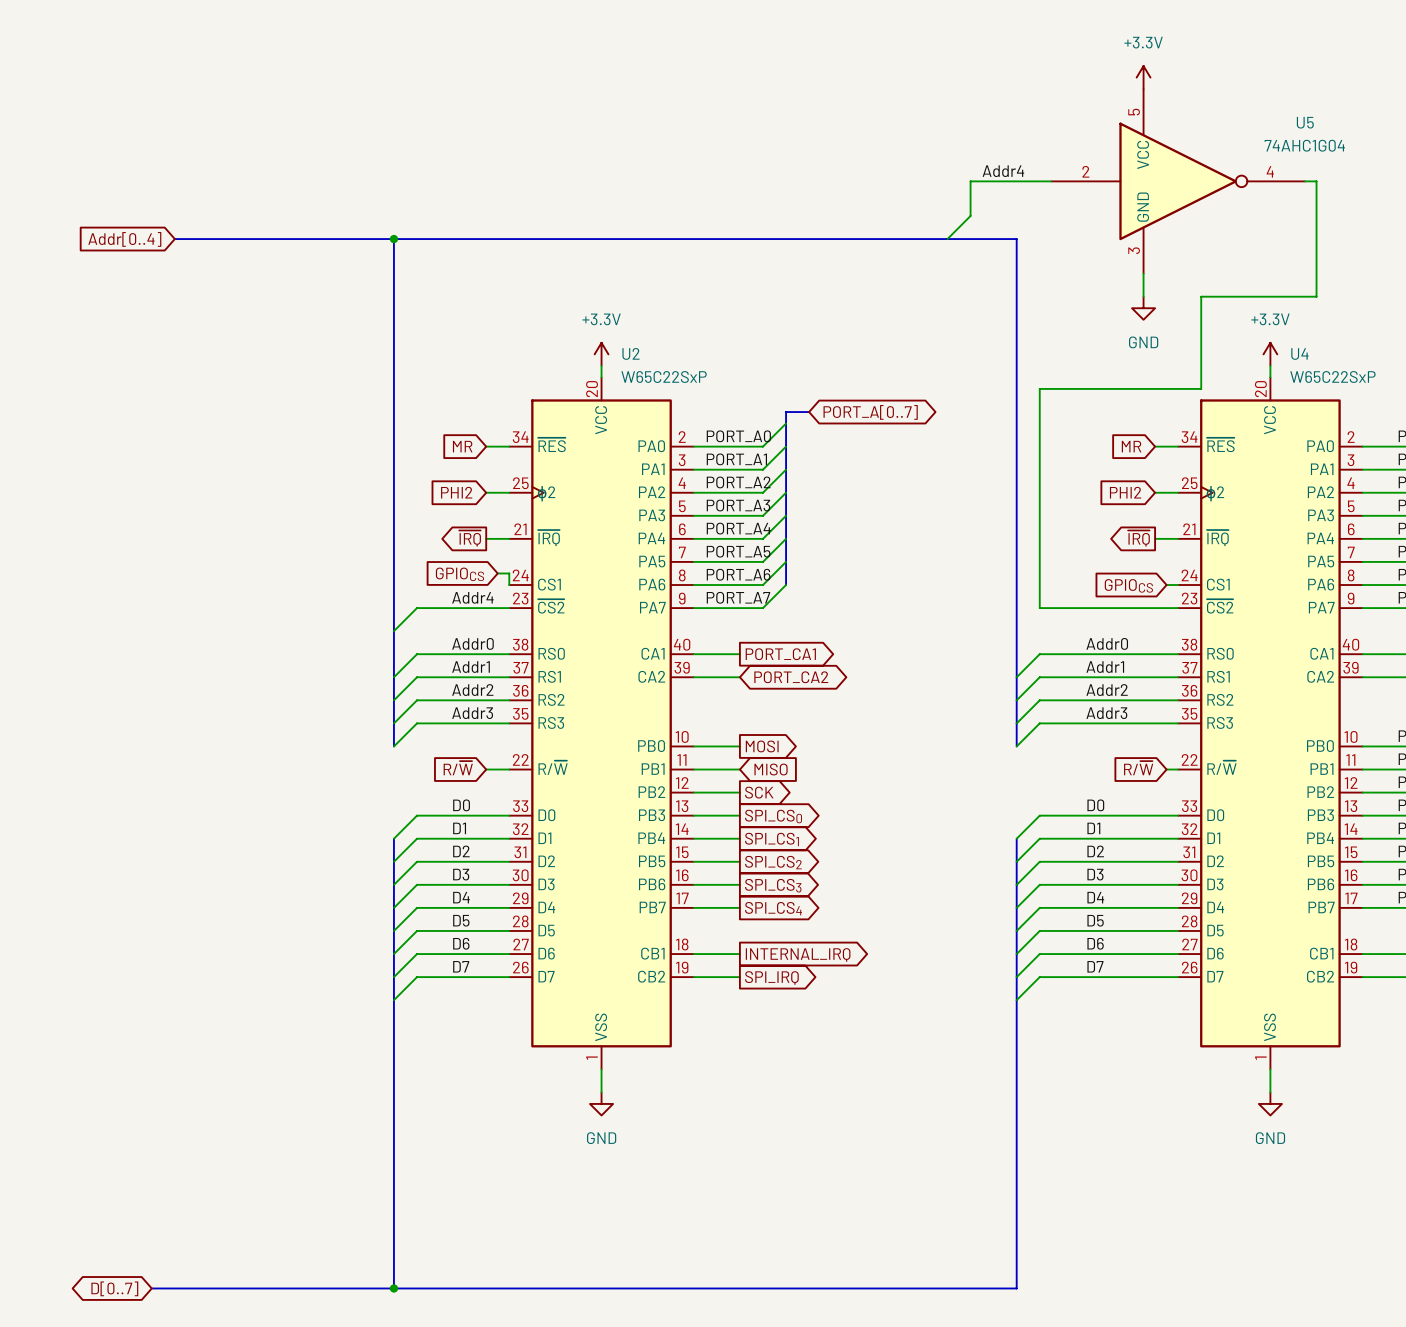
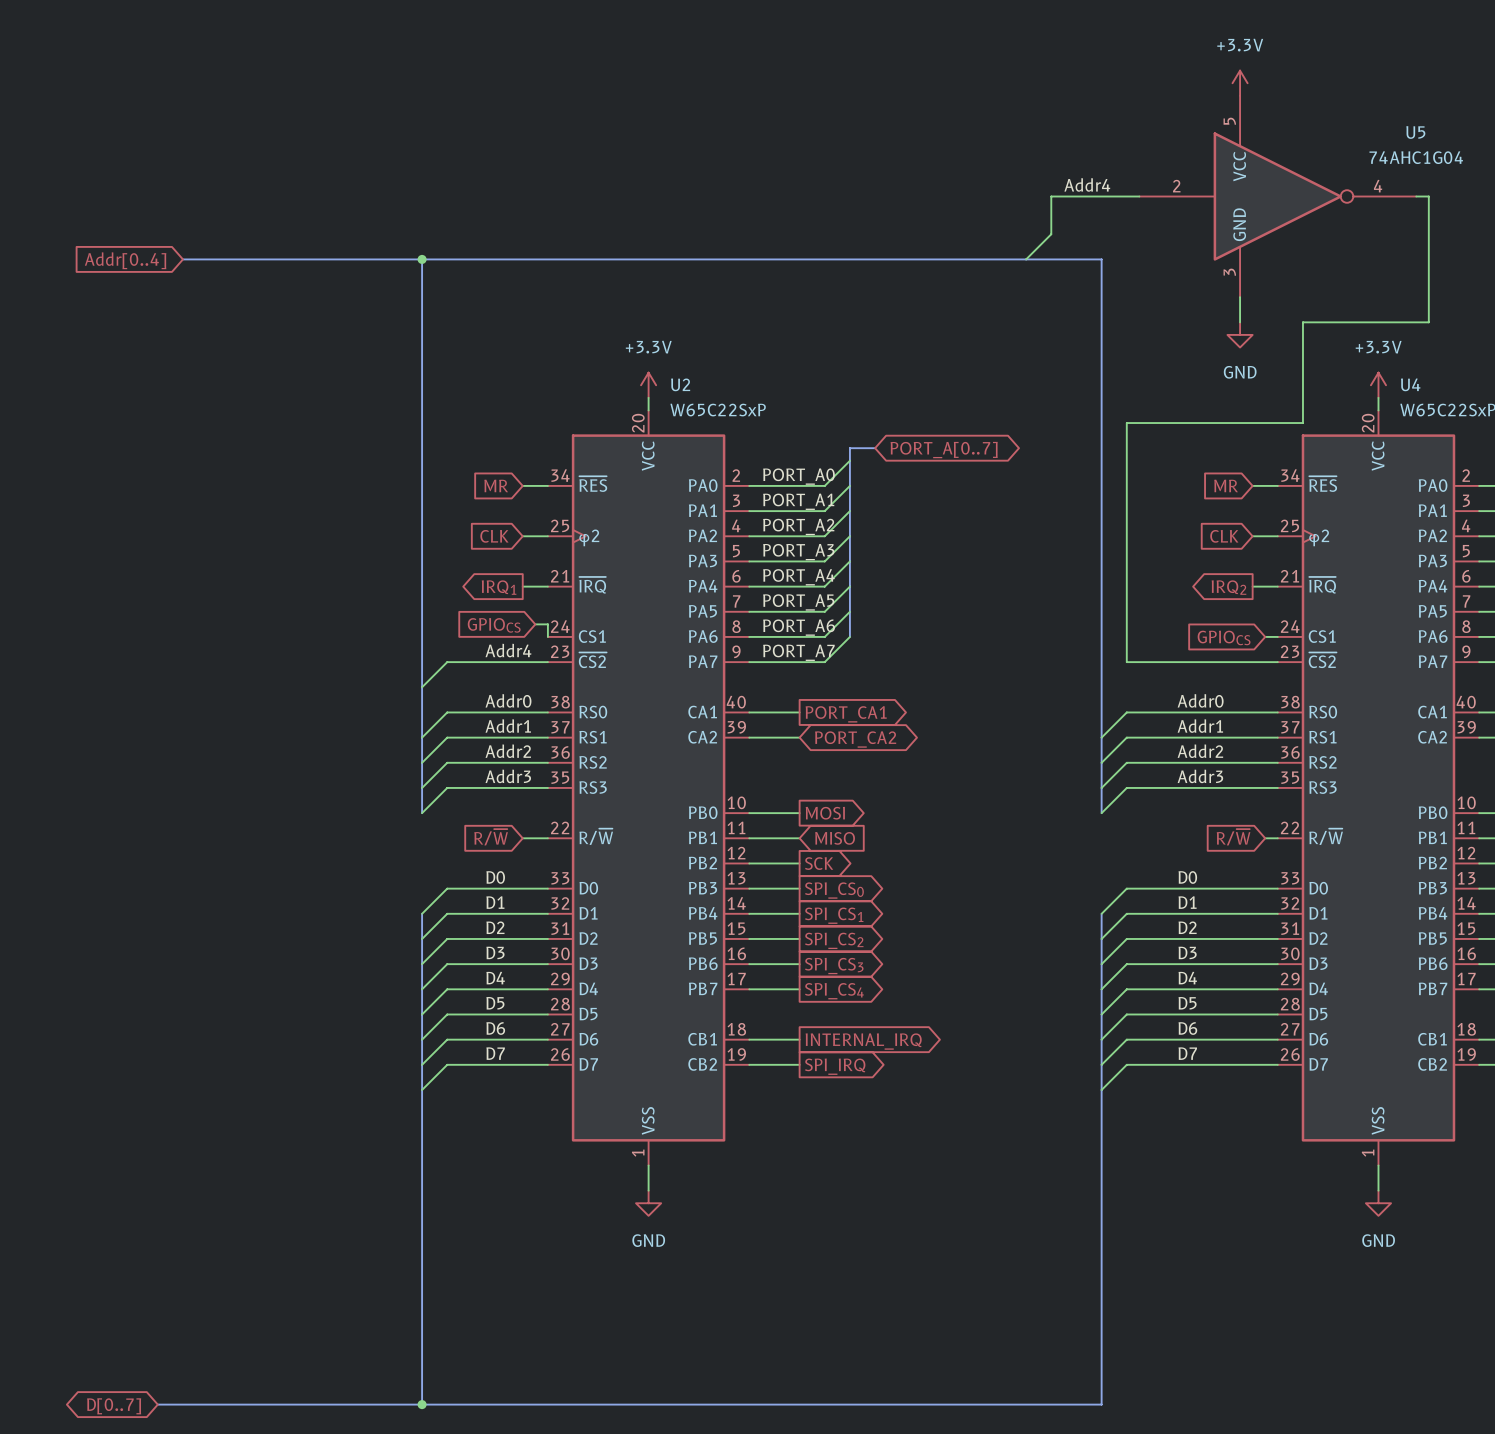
global label: PHI2 (456, 492) -> CLK (494, 536)
global label: PHI2 (1125, 492) -> CLK (1224, 536)
global label: ~{IRQ} (470, 538) -> IRQ1 (499, 587)
global label: ~{IRQ} (1138, 538) -> IRQ2 (1228, 587)

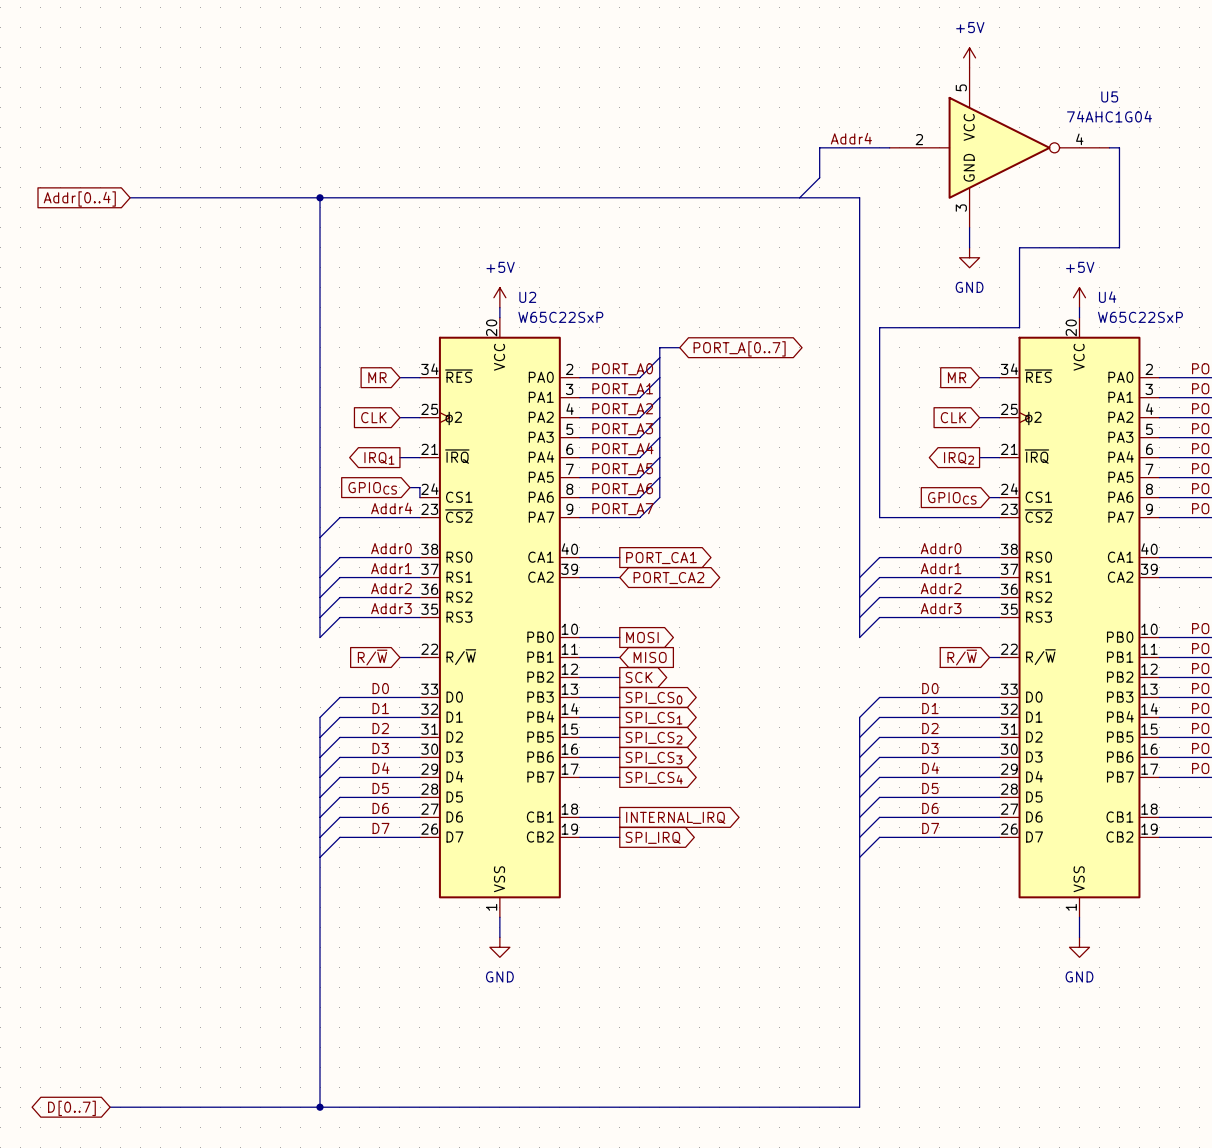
power symbol: +3.3V (1240, 83) -> +5V (969, 57)
power symbol: +3.3V (648, 385) -> +5V (499, 297)
power symbol: +3.3V (1378, 385) -> +5V (1079, 297)

